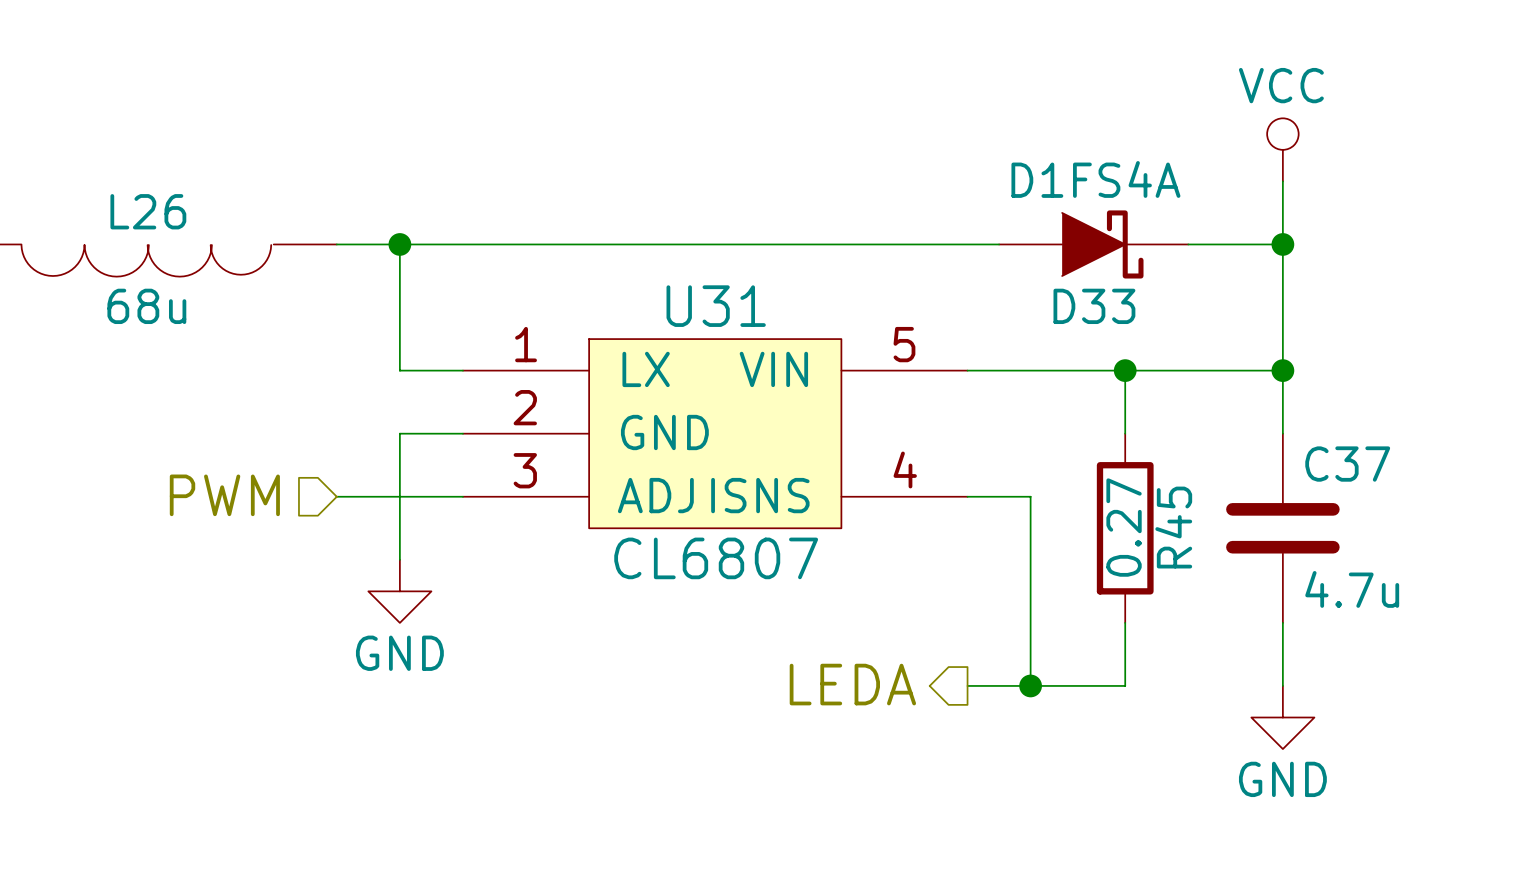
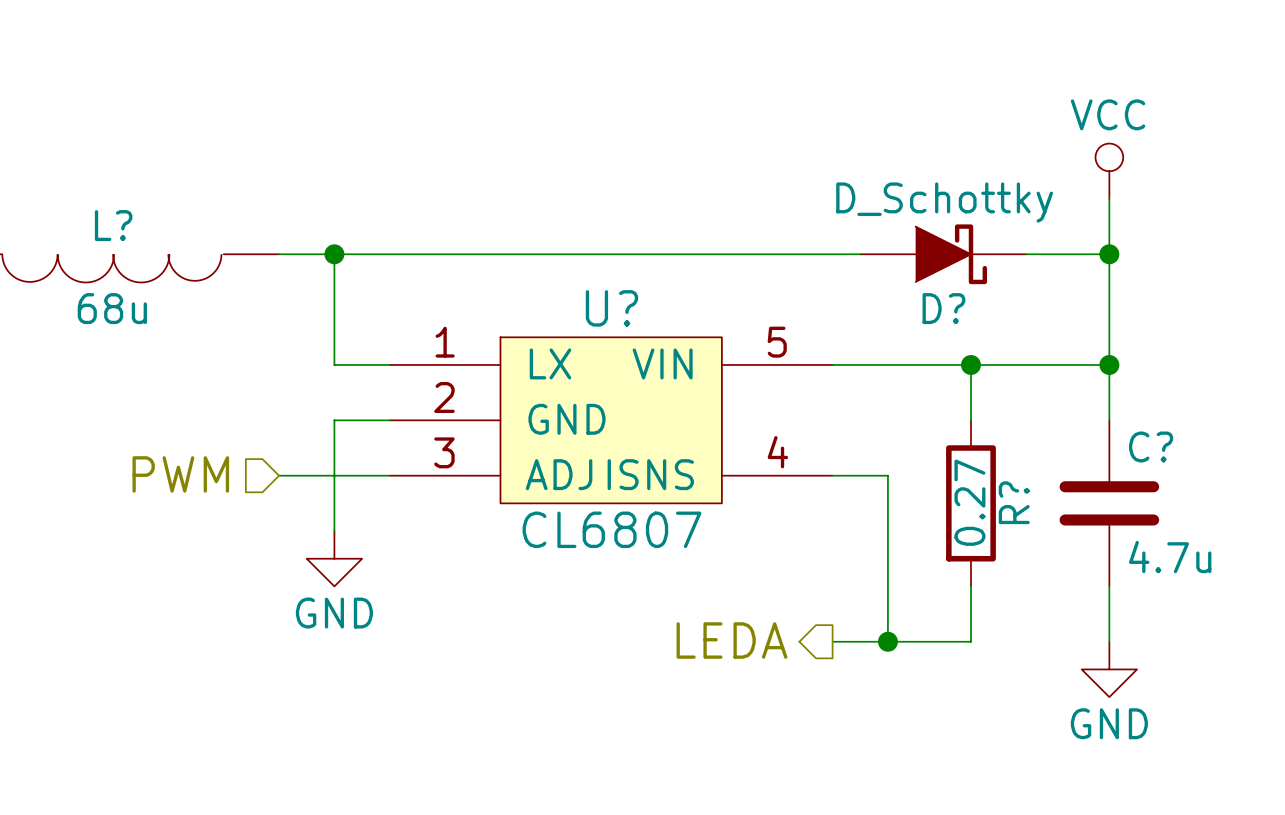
D33 value: D1FS4A (1095, 179) -> D_Schottky (944, 202)
L26 name: L26 (148, 211) -> L? (113, 225)
U31 name: U31 (716, 306) -> U? (611, 308)
D33 name: D33 (1094, 306) -> D? (943, 308)
C37 name: C37 (1347, 464) -> C? (1151, 446)
R45 name: R45 (1173, 527) -> R? (1014, 502)

